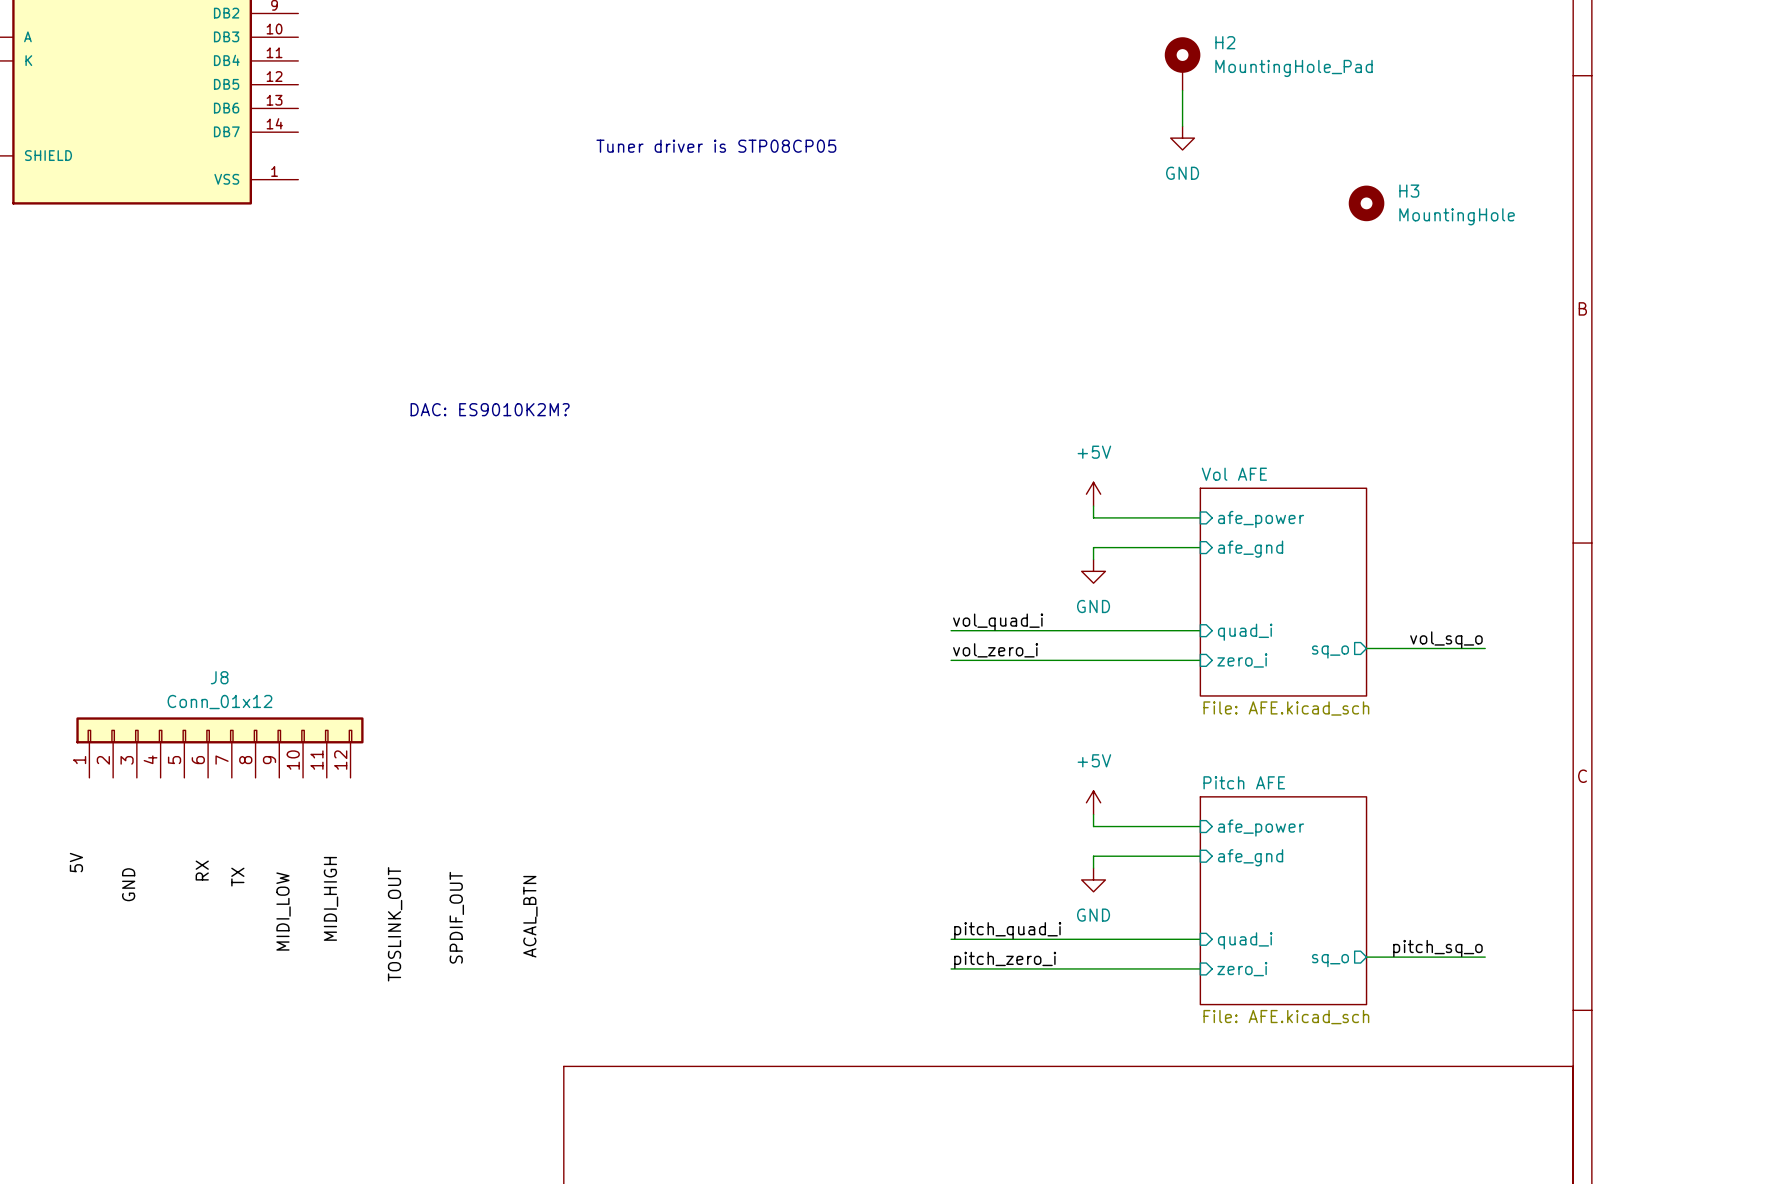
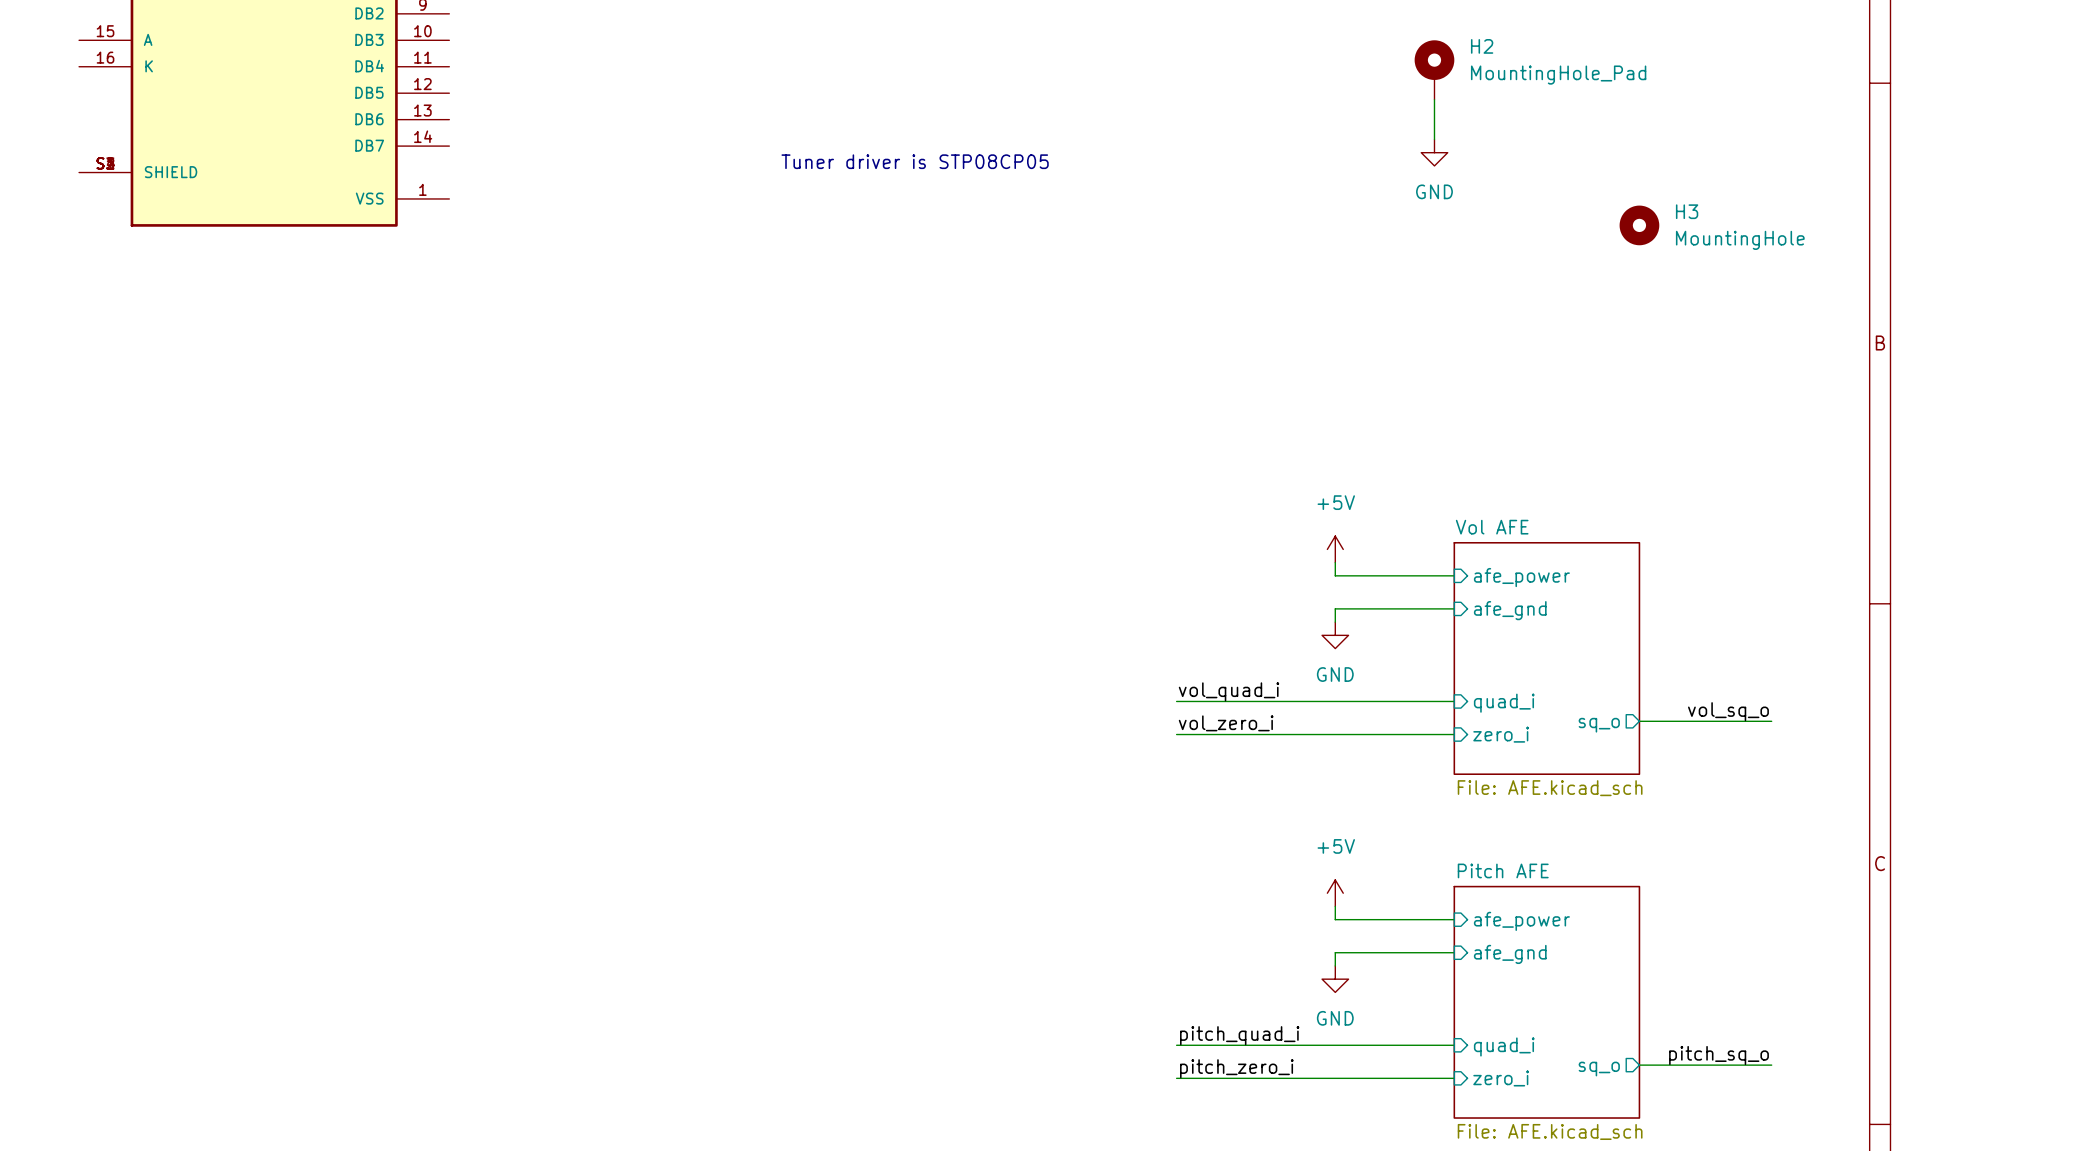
text: DAC: ES9010K2M? (490, 409) -> none
J8: Conn_01x12 (219, 747) -> none
label: 5V (76, 862) -> none
label: RX (202, 870) -> none
label: TX (237, 877) -> none
label: GND (128, 884) -> none
label: MIDI_HIGH (330, 898) -> none
label: MIDI_LOW (283, 911) -> none
label: ACAL_BTN (530, 916) -> none
label: SPDIF_OUT (456, 917) -> none
label: TOSLINK_OUT (395, 924) -> none

